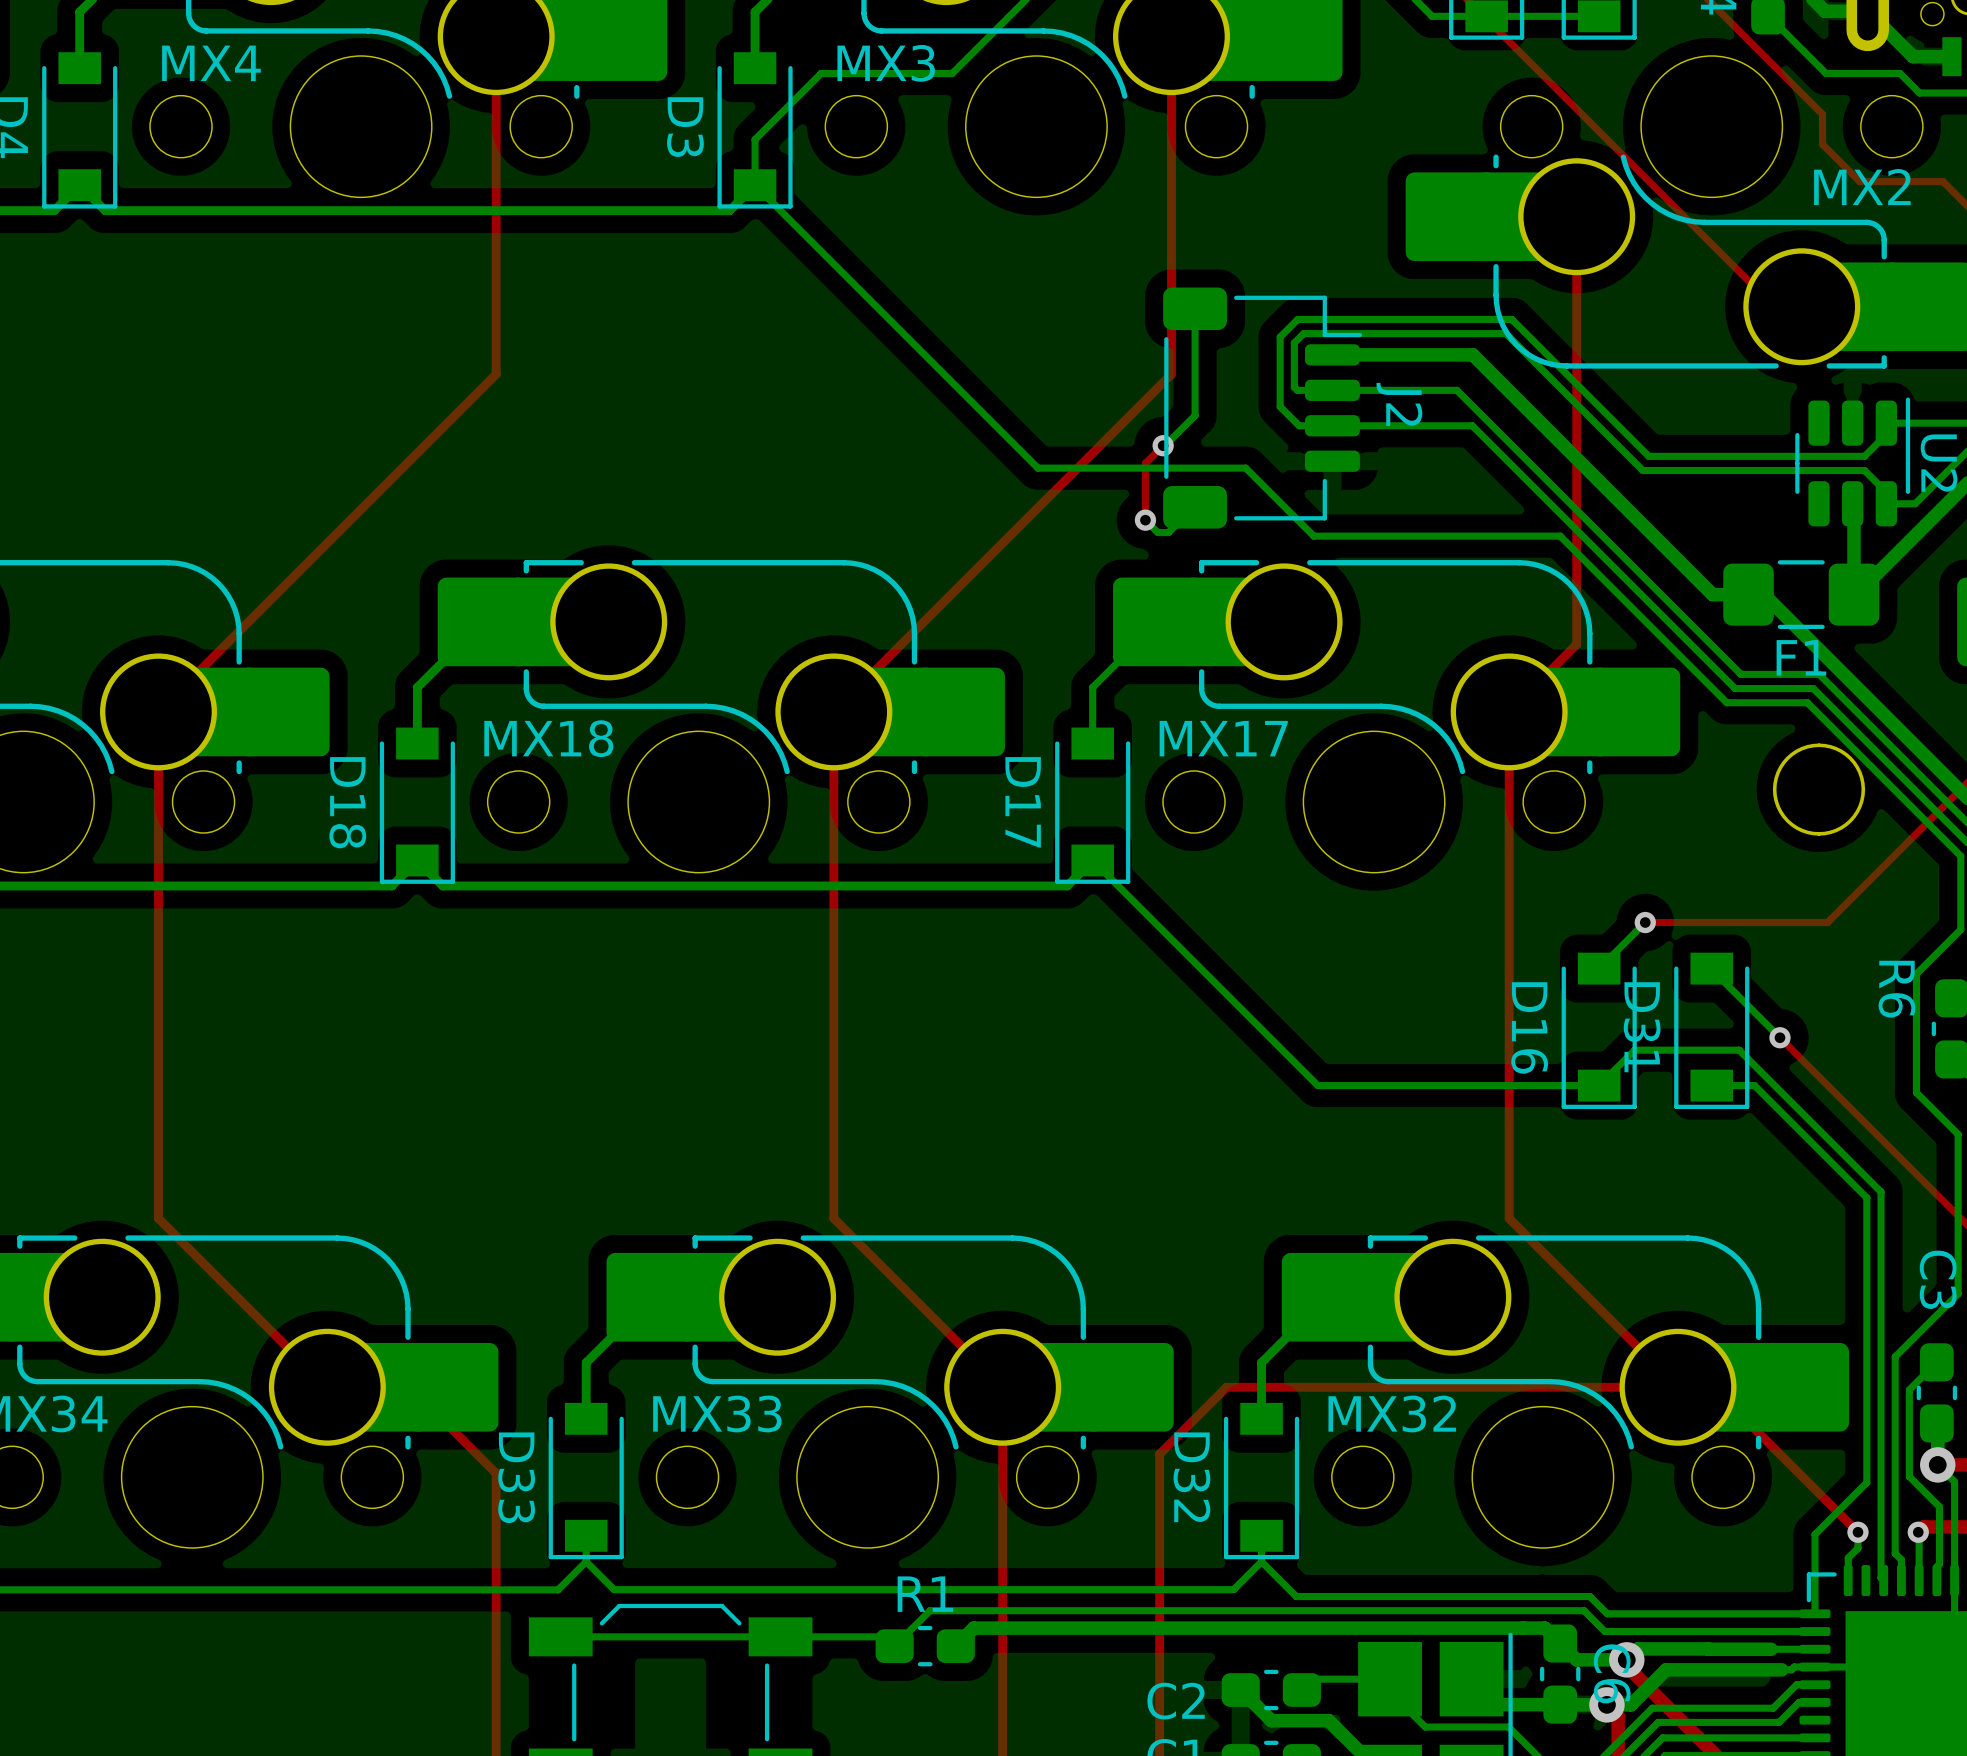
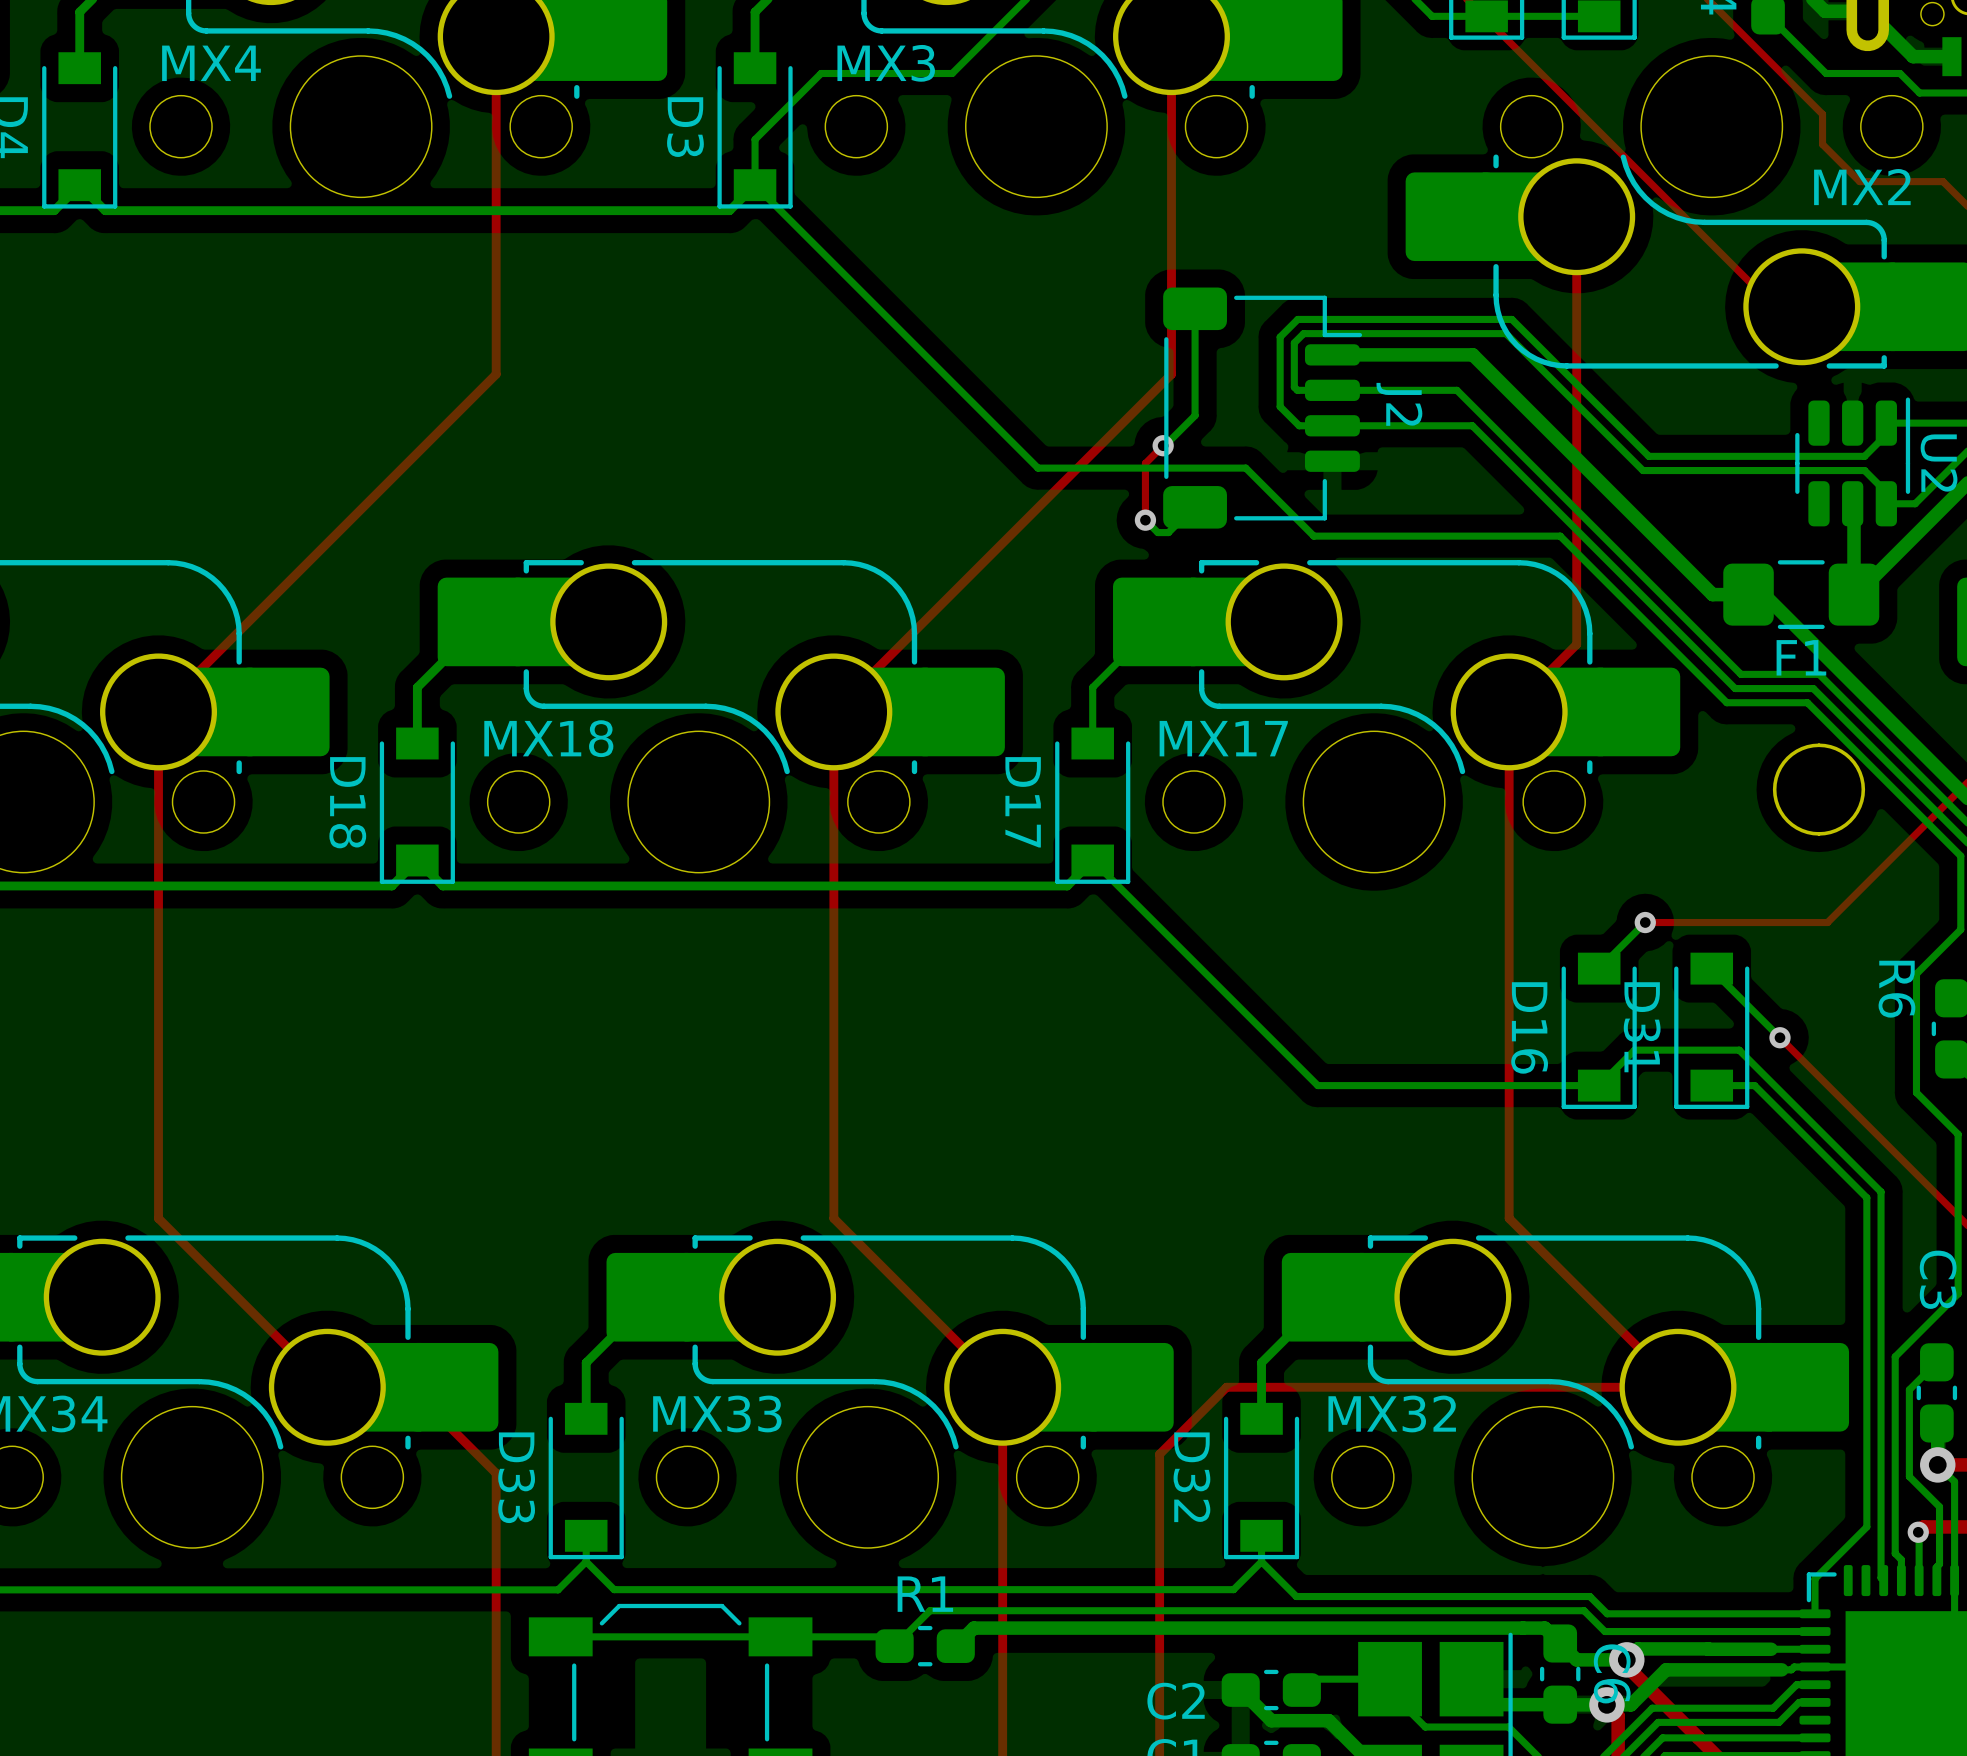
top track: (1677, 1387) (1713, 1387) (1857, 1532) -> none
bottom track: (1866, 1482) (1815, 1534) (1815, 1578) -> (1866, 1482) (1866, 1526) (1815, 1578)
bottom track: (1857, 1532) (1857, 1548) (1848, 1557) (1848, 1580) -> none
via: (1857, 1532) -> none

